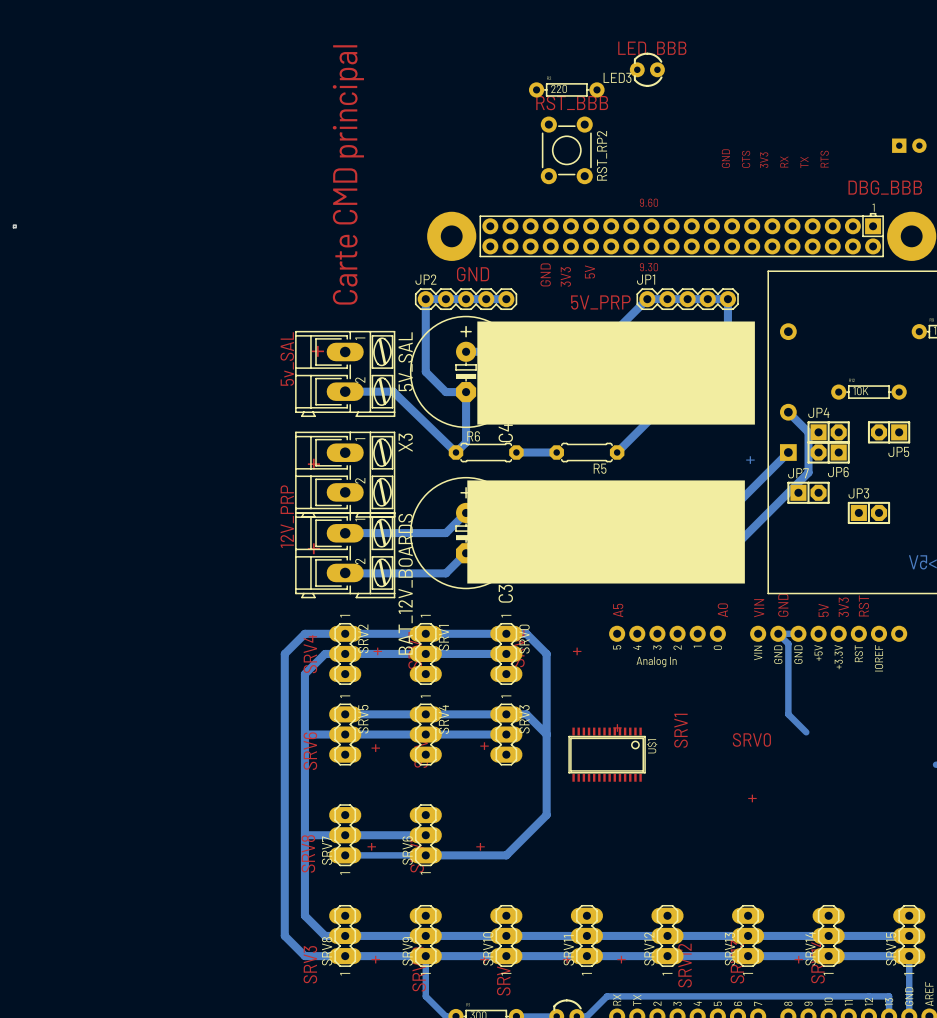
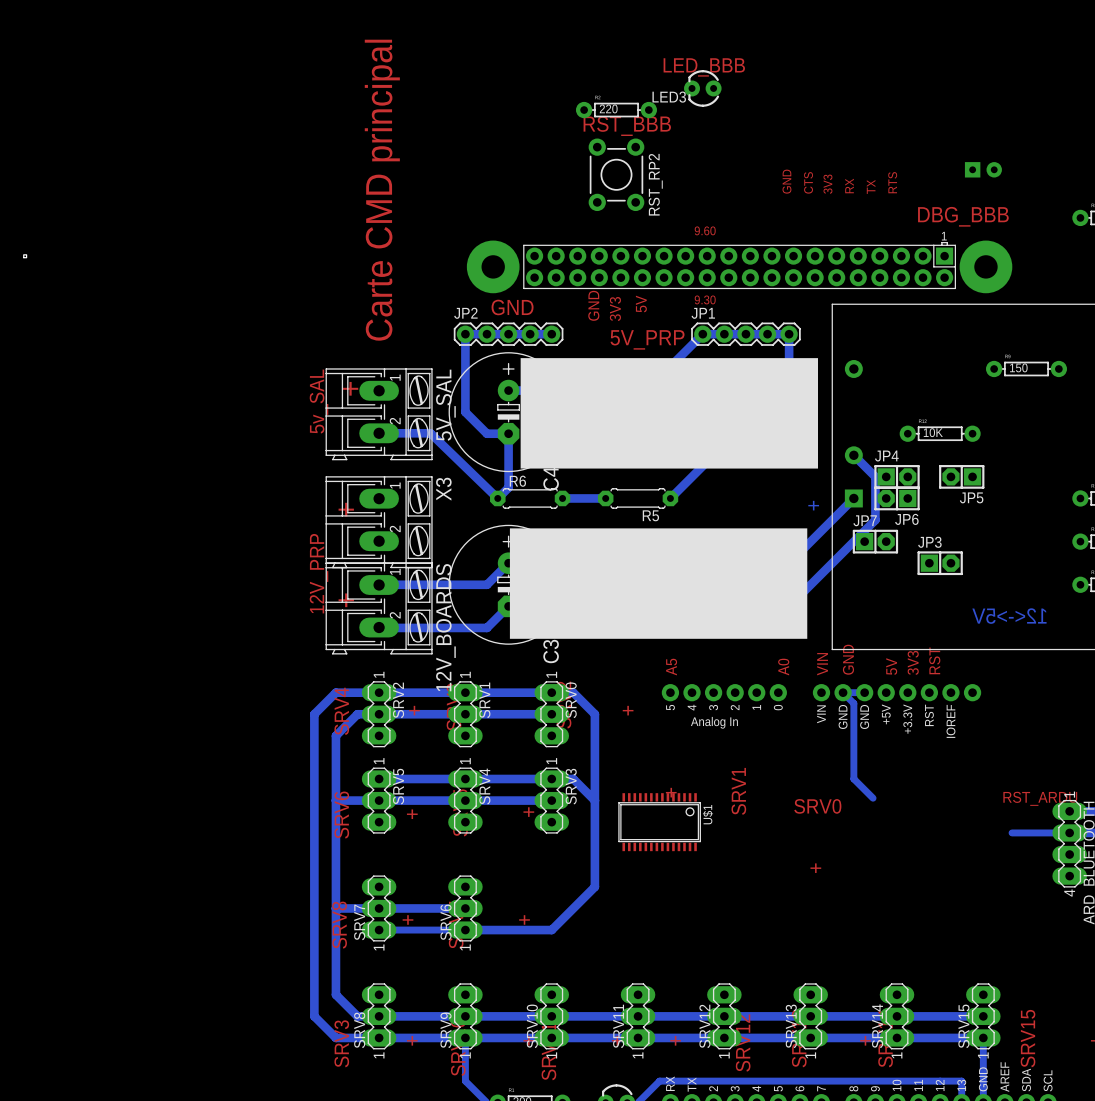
BAT_12V_BOARDS name: BAT_12V_BOARDS (405, 584) -> 12V_BOARDS (445, 627)

